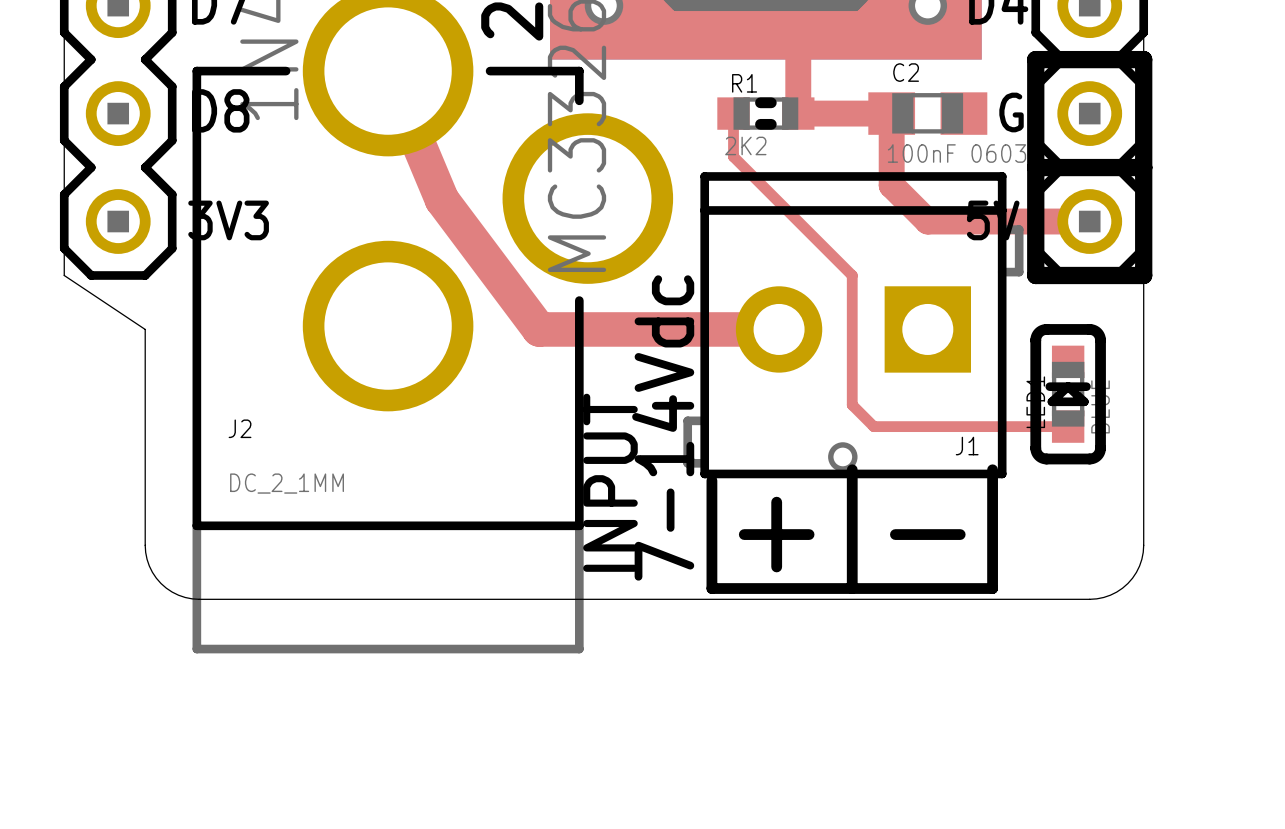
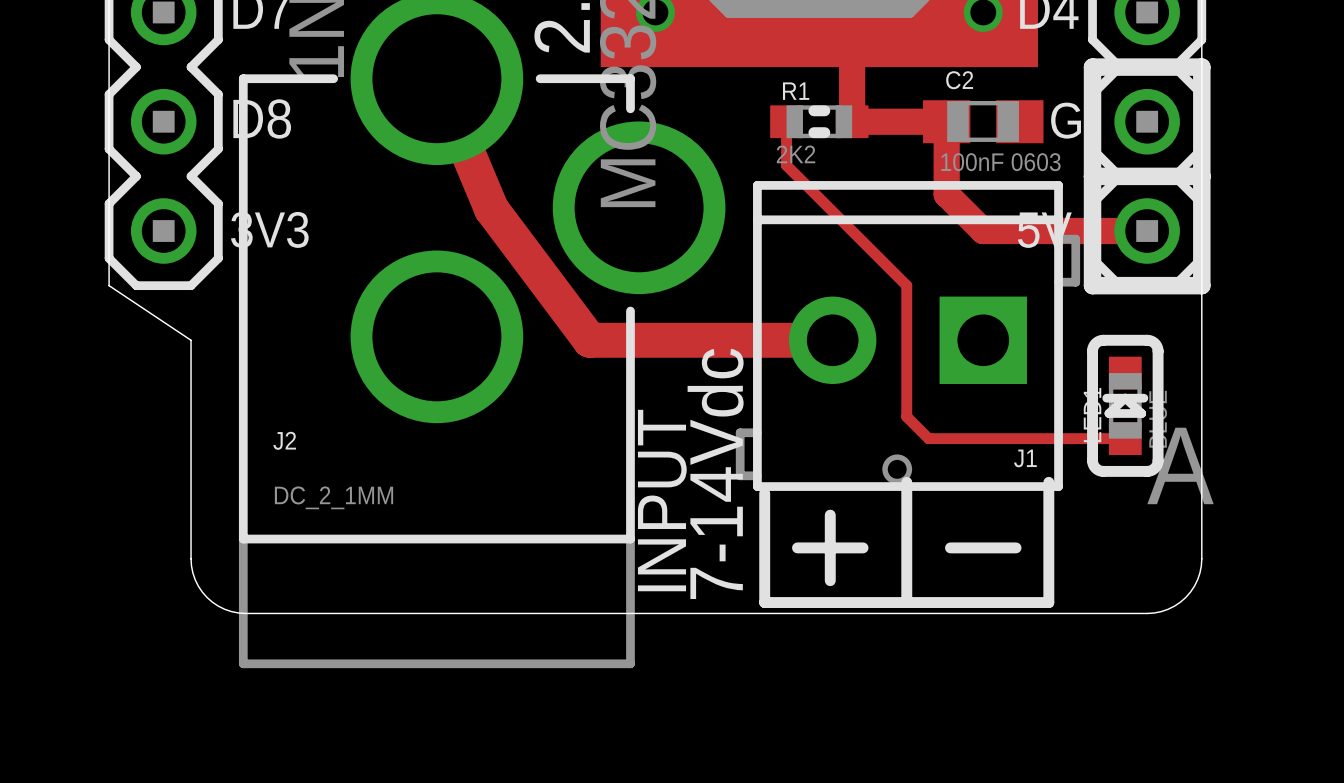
text: none -> A (1180, 465)

